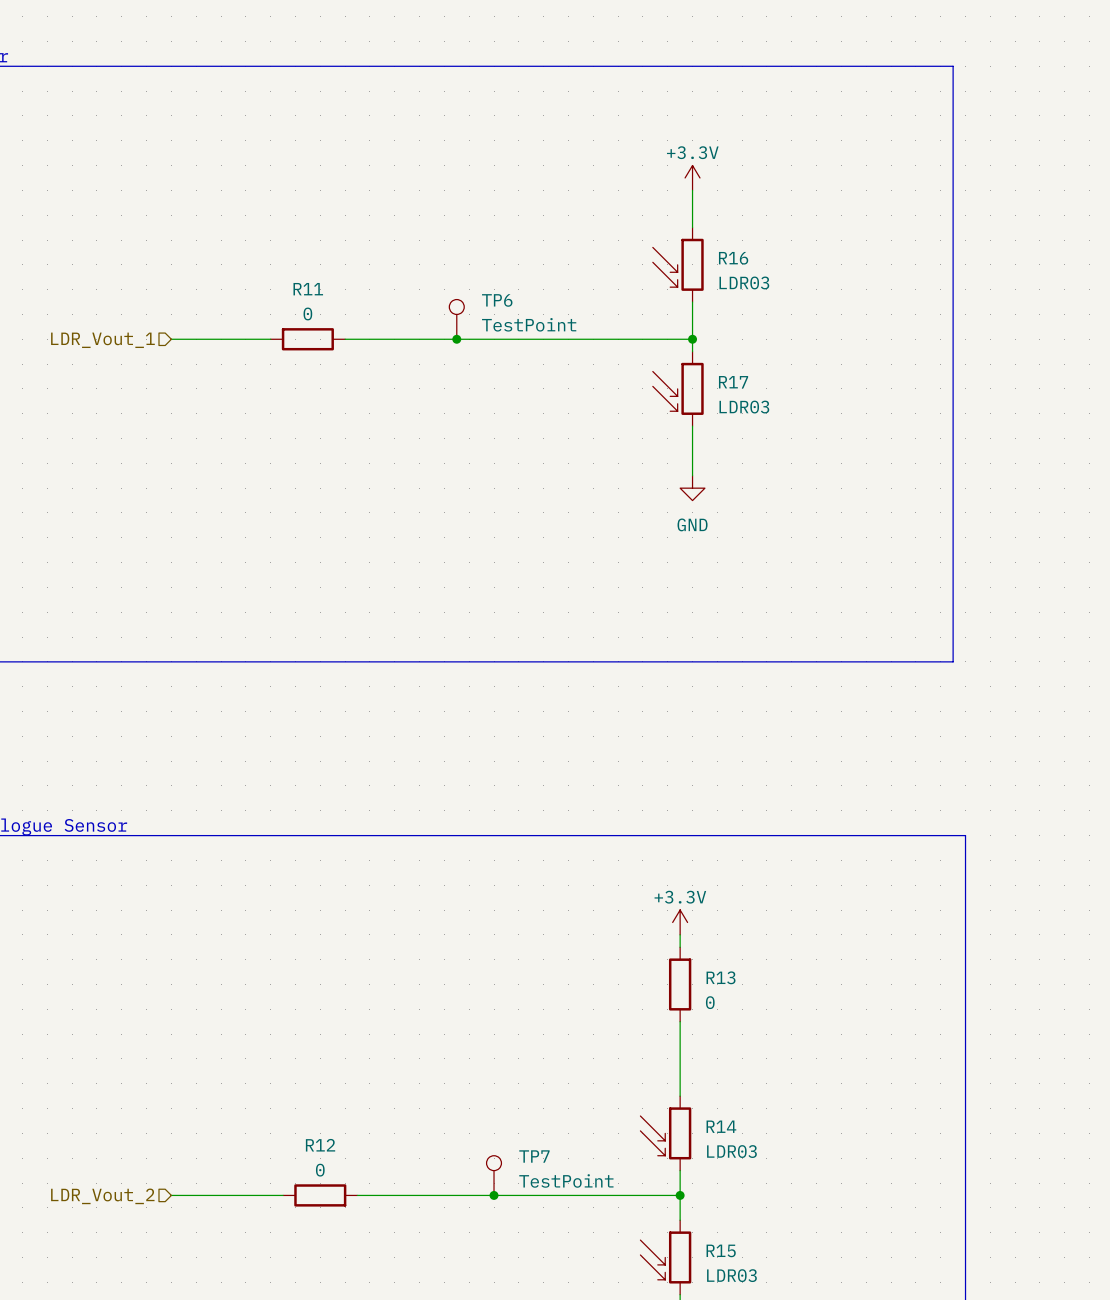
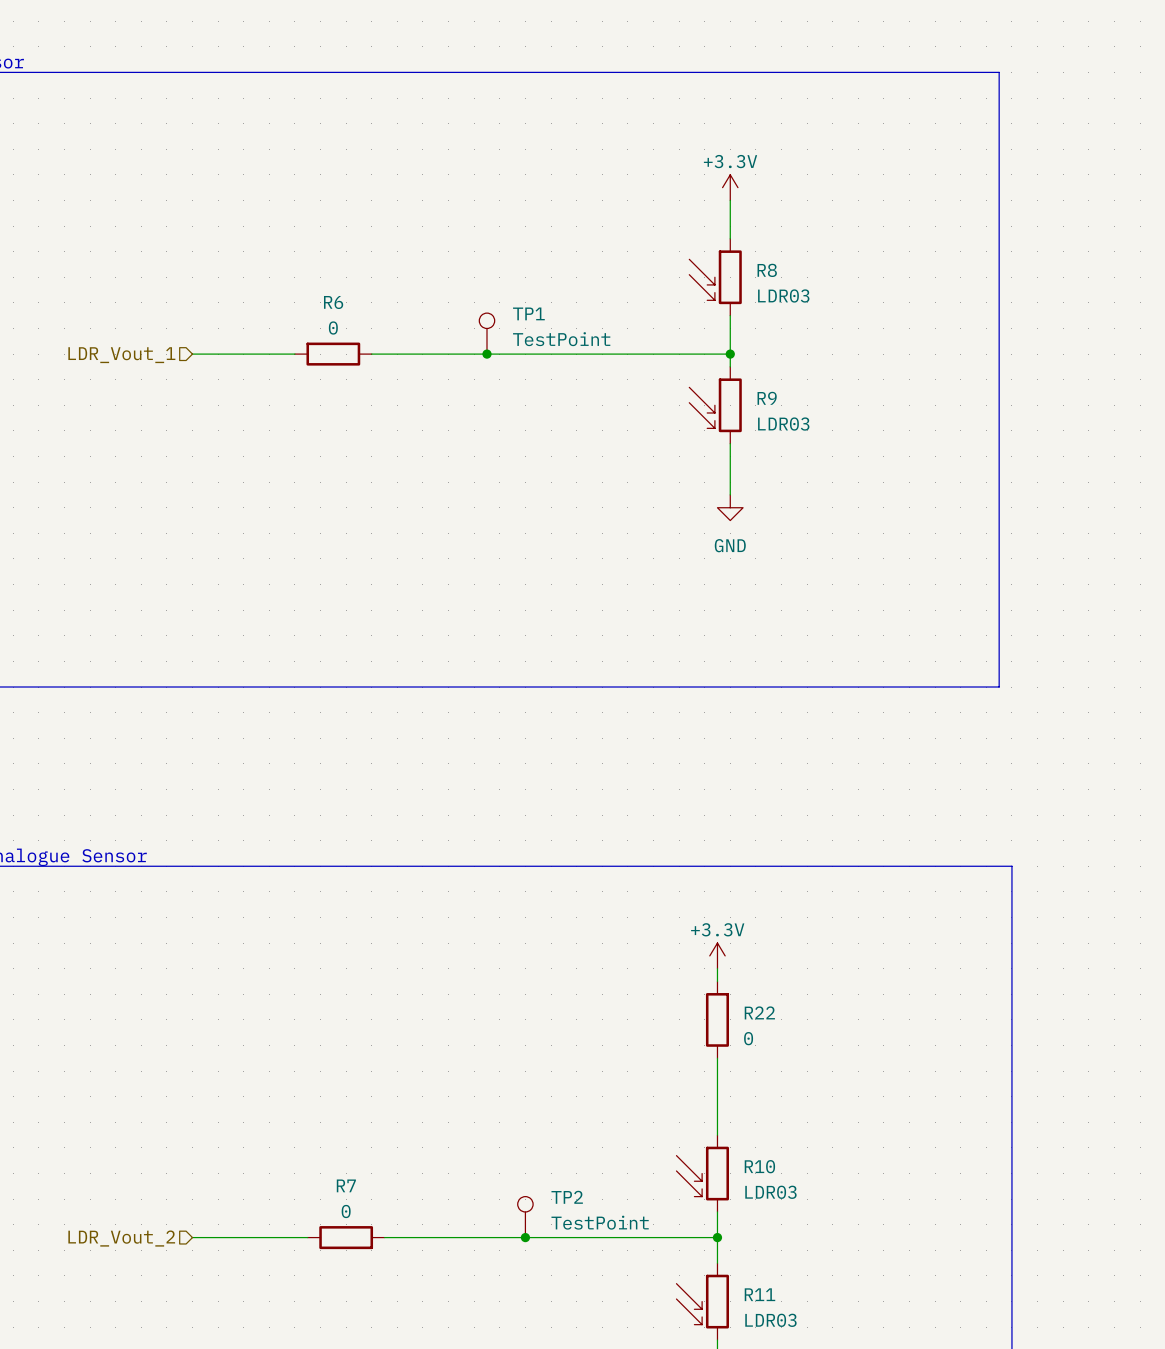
R16 name: R16 (733, 258) -> R8 (767, 270)
R11 name: R11 (308, 289) -> R6 (333, 302)
TP6 name: TP6 (497, 300) -> TP1 (528, 313)
R17 name: R17 (733, 382) -> R9 (767, 398)
R13 name: R13 (721, 977) -> R22 (759, 1012)
R14 name: R14 (721, 1126) -> R10 (759, 1166)
R12 name: R12 (320, 1145) -> R7 (346, 1185)
TP7 name: TP7 (534, 1156) -> TP2 (567, 1197)
R15 name: R15 (721, 1250) -> R11 (759, 1294)

